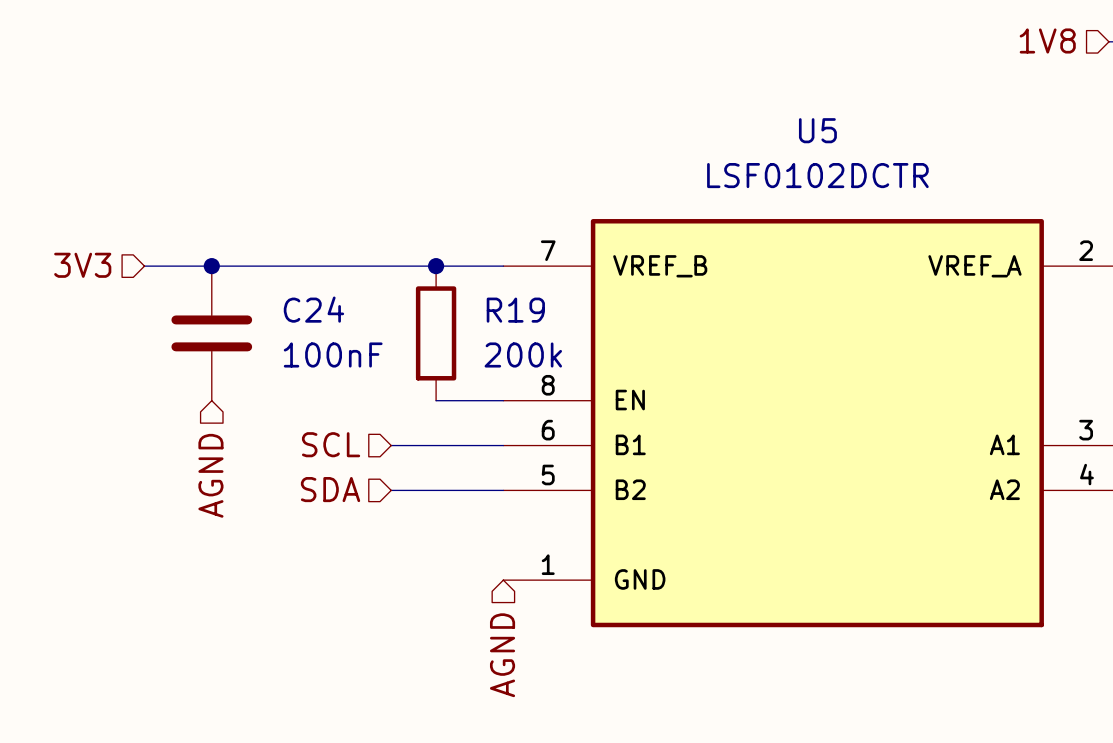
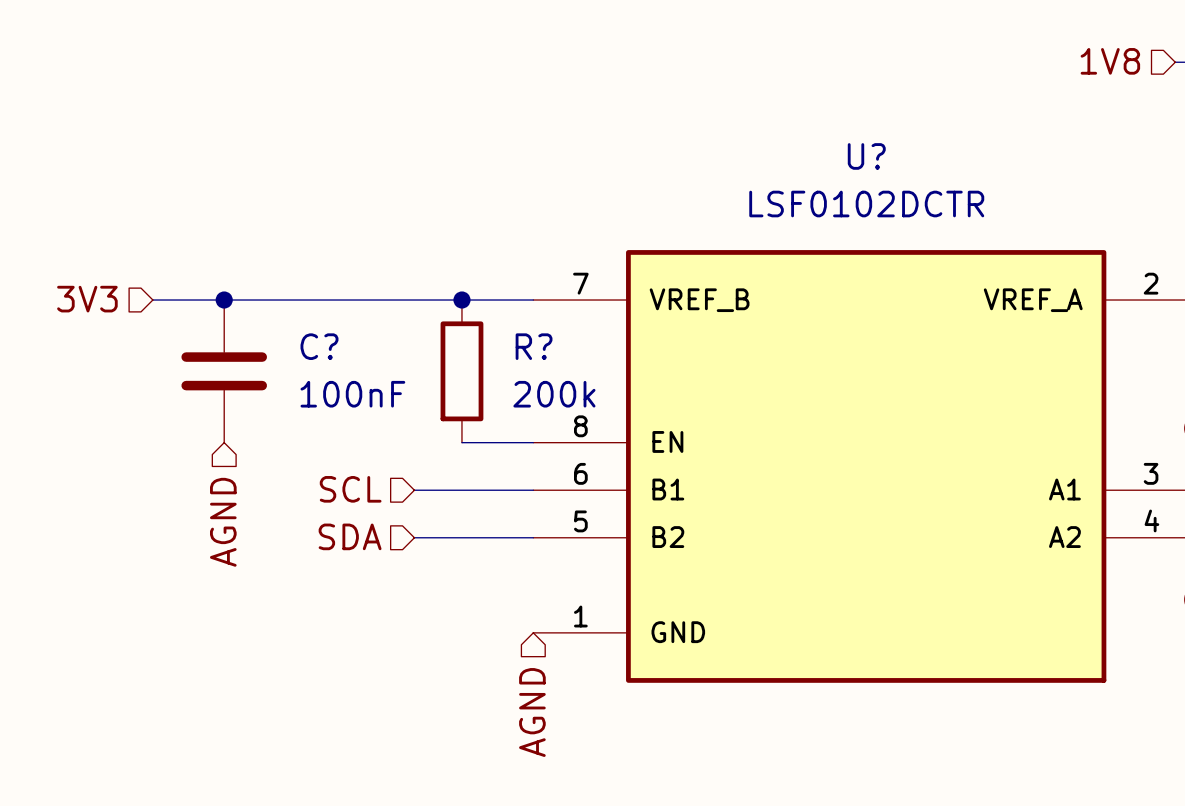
U5 name: U5 (817, 130) -> U? (866, 156)
C24 name: C24 (313, 309) -> C? (319, 346)
R19 name: R19 (515, 310) -> R? (534, 346)

